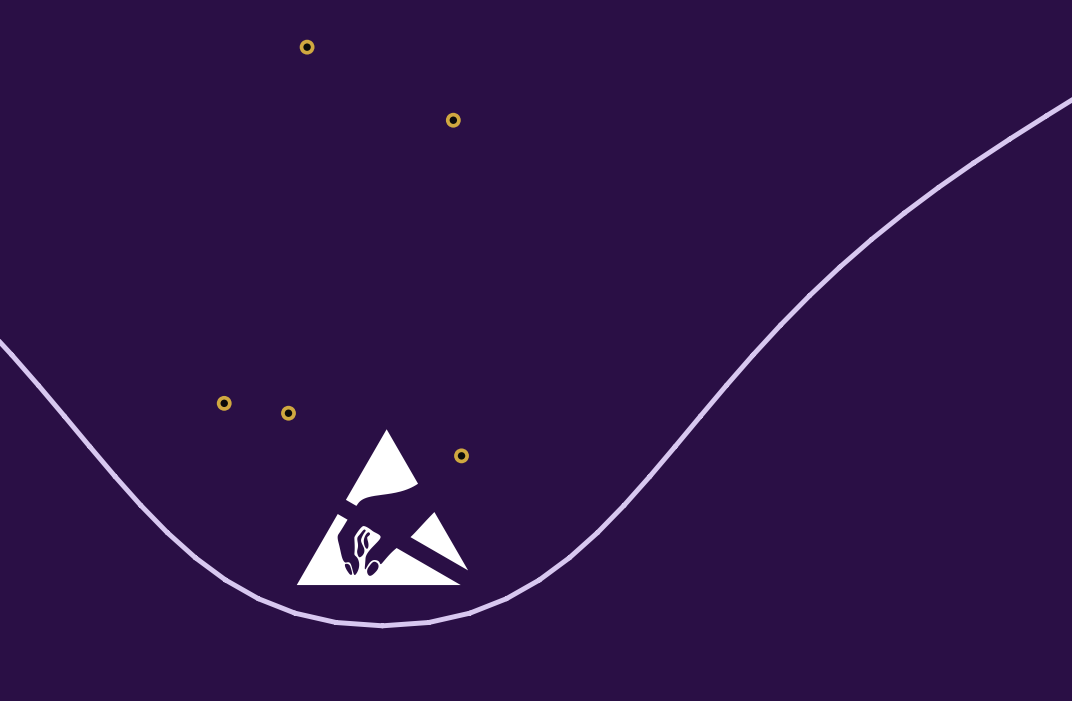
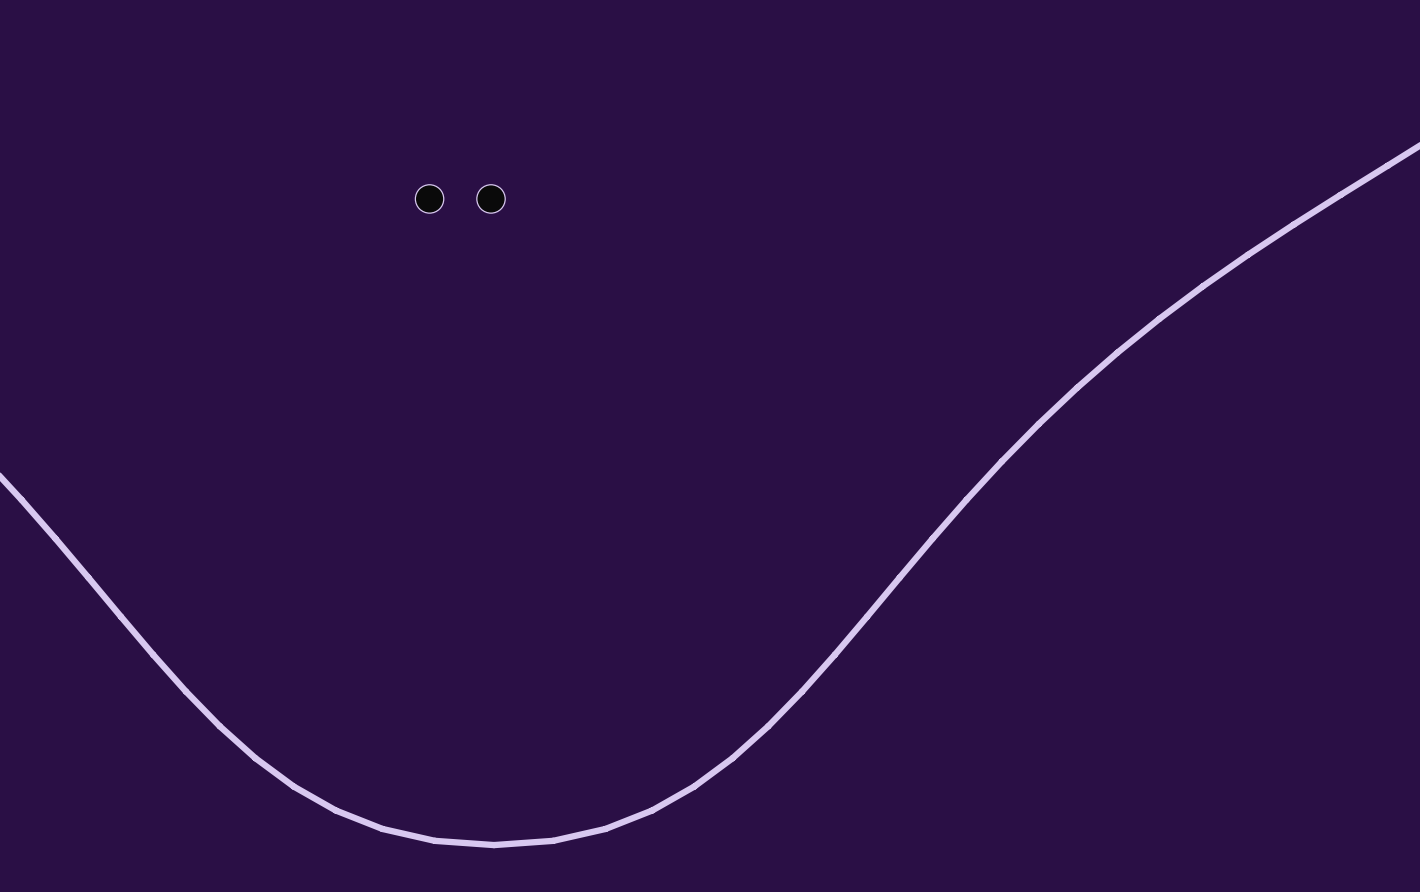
via: (307, 47) -> none
part: none -> (460, 198)
via: (453, 120) -> none
via: (224, 403) -> none
via: (288, 413) -> none
drawing: [296, 429, 469, 586] -> none
via: (461, 455) -> none

